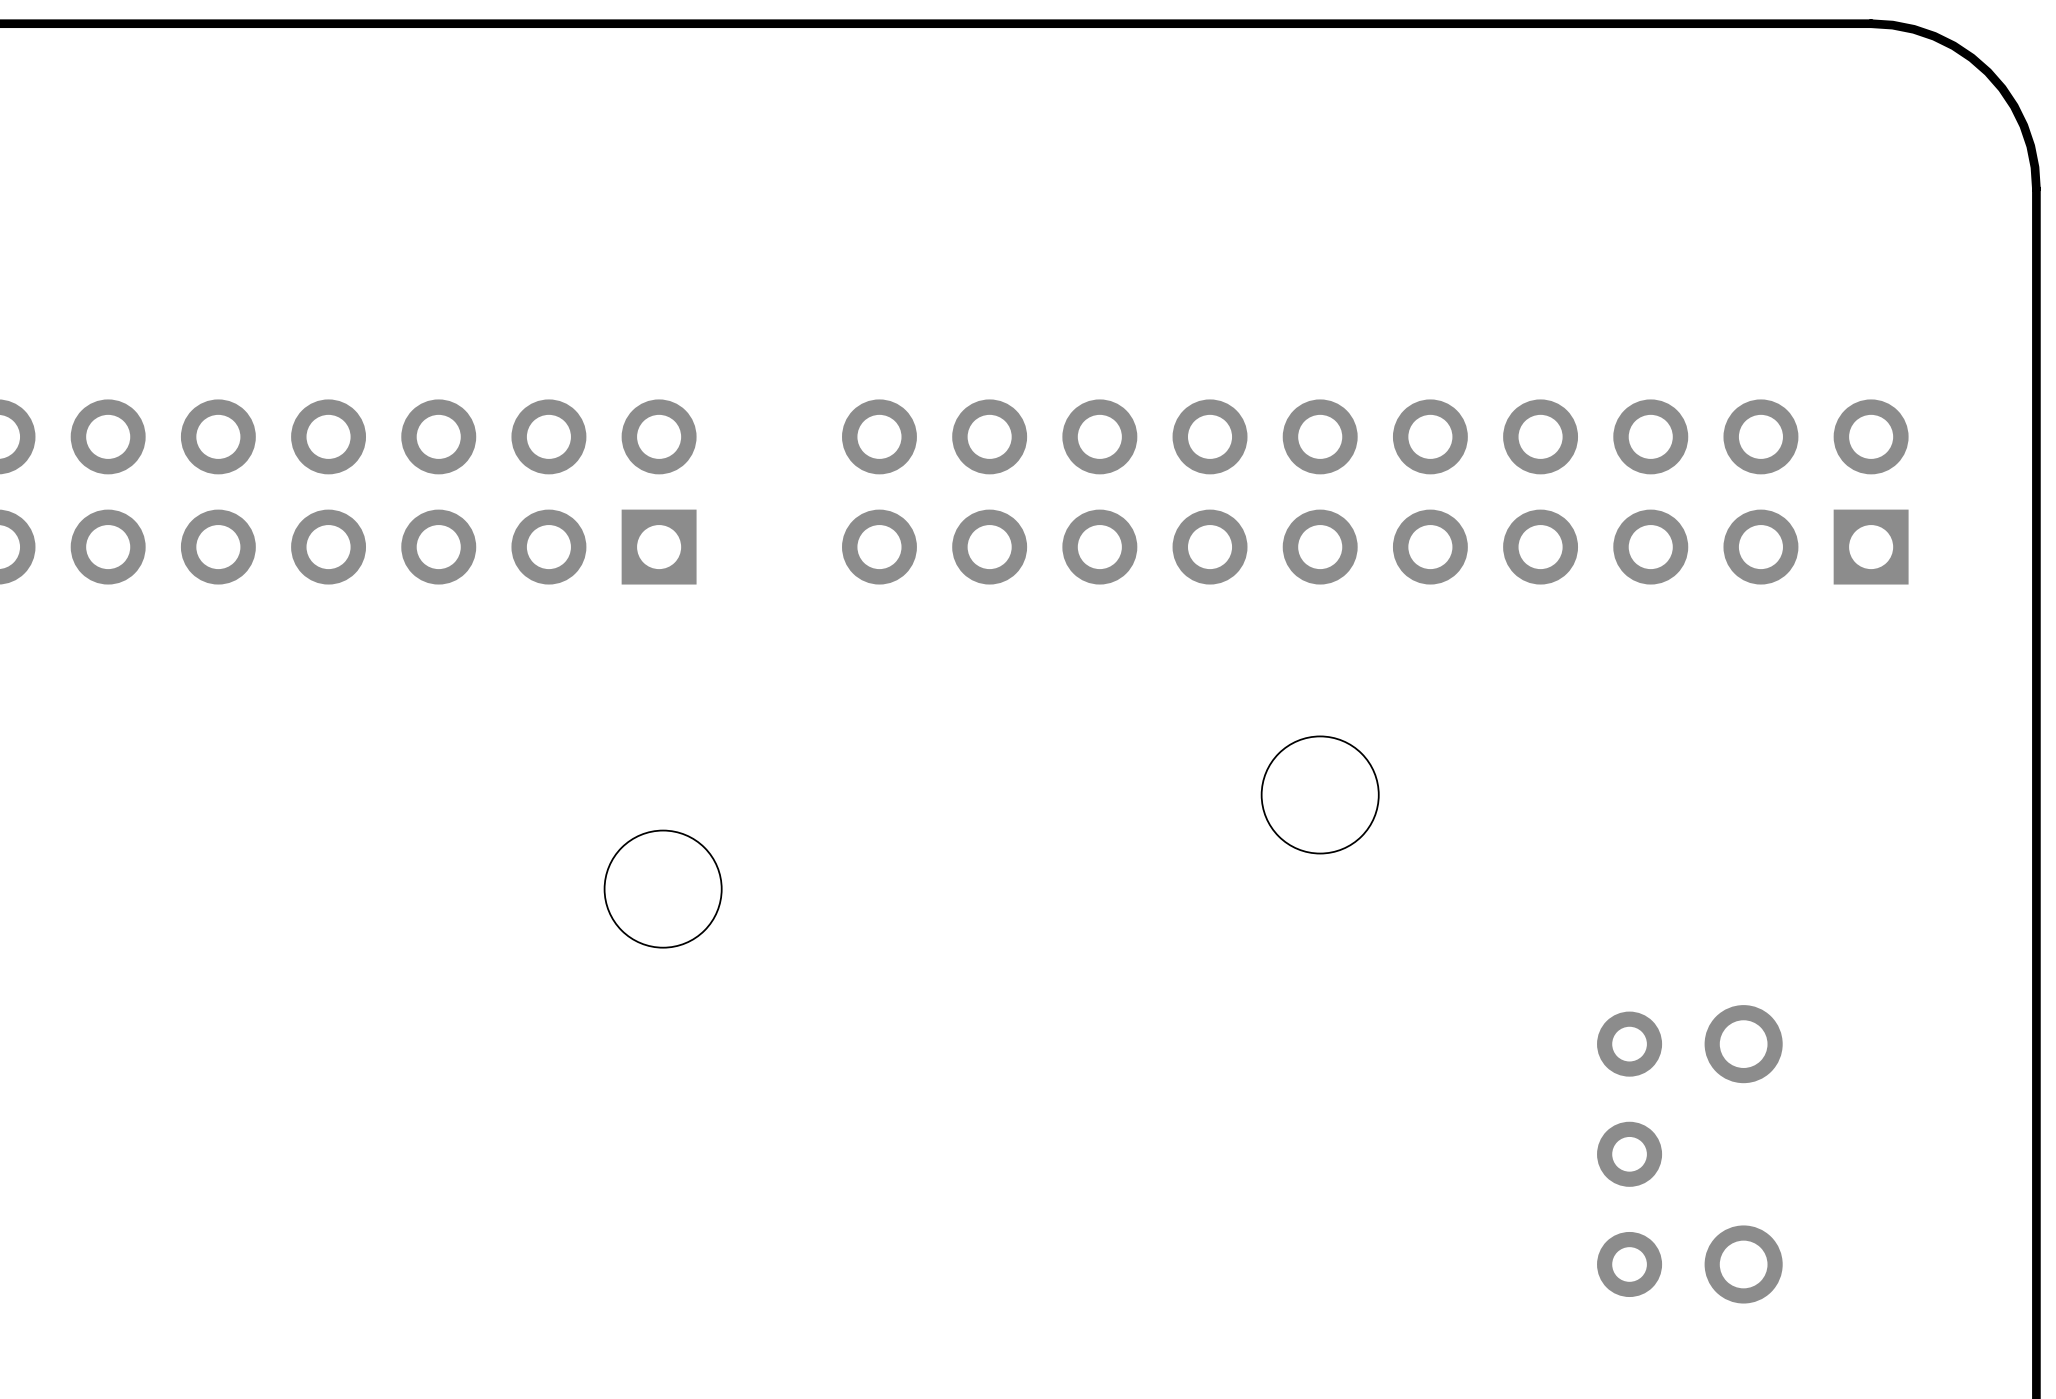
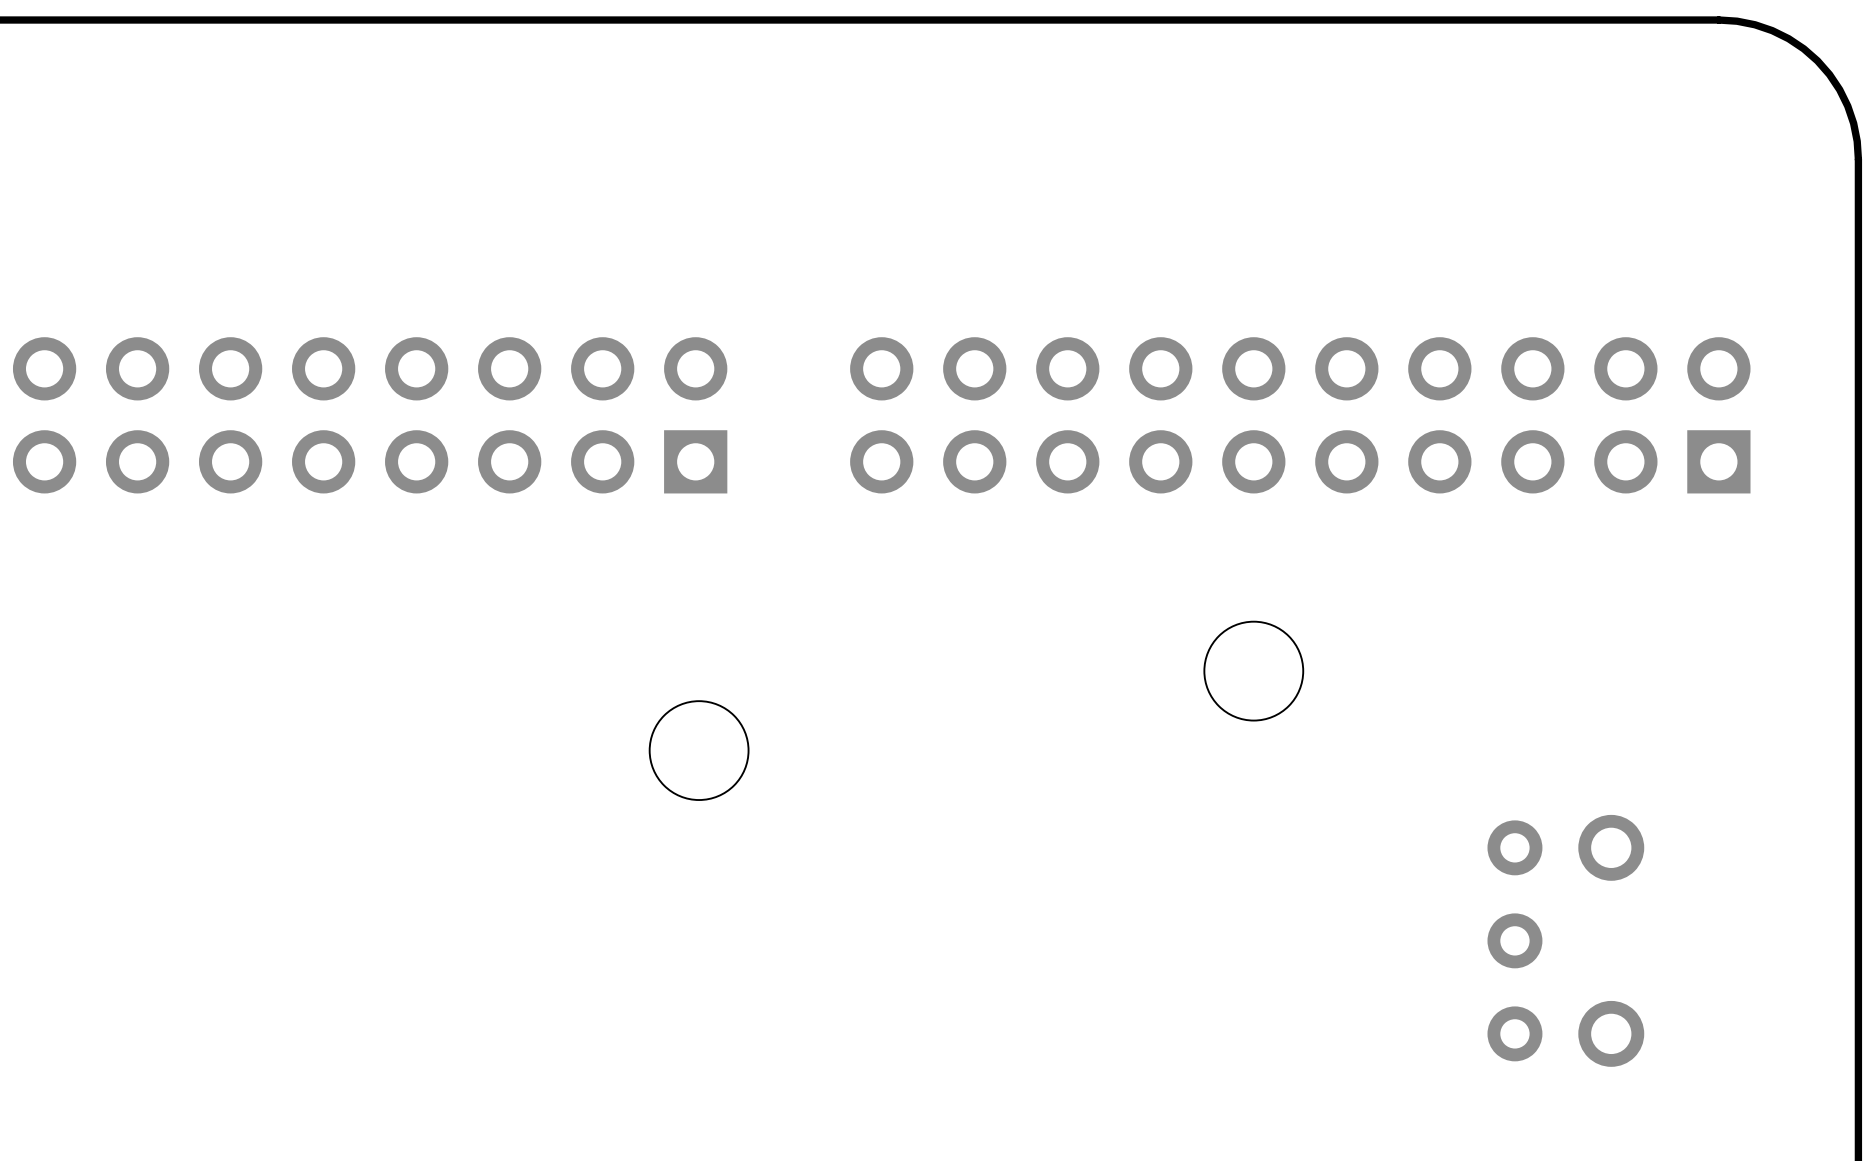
part position: (1689, 1154) -> (1565, 940)

